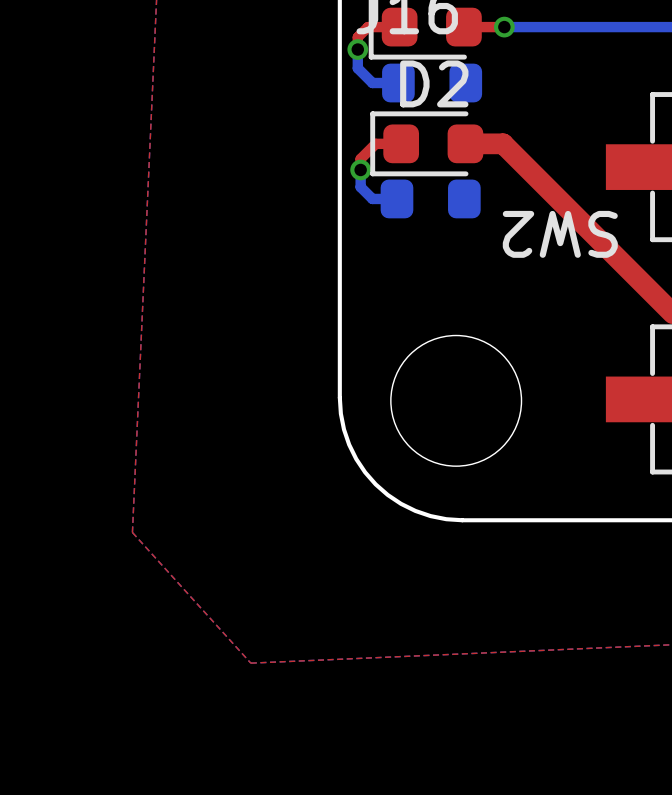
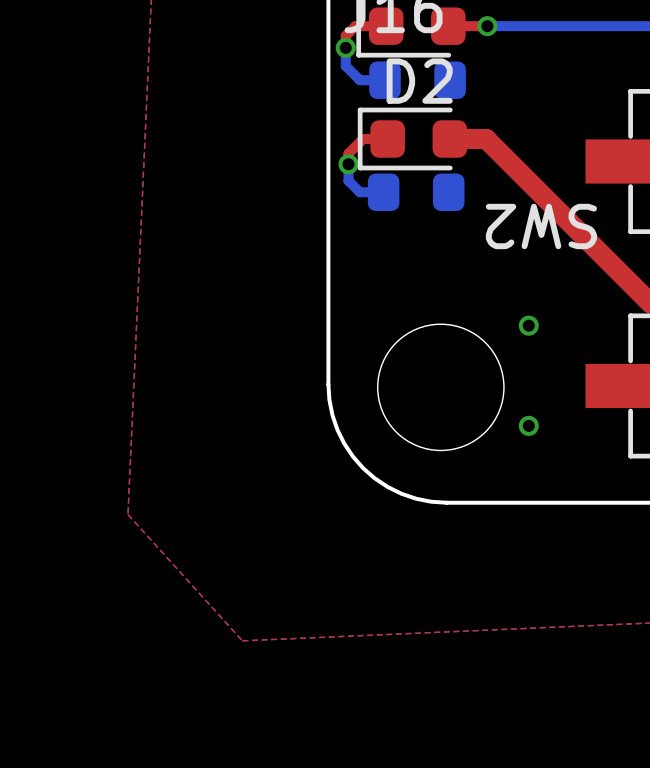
via: none -> (528, 325)
via: none -> (528, 425)

